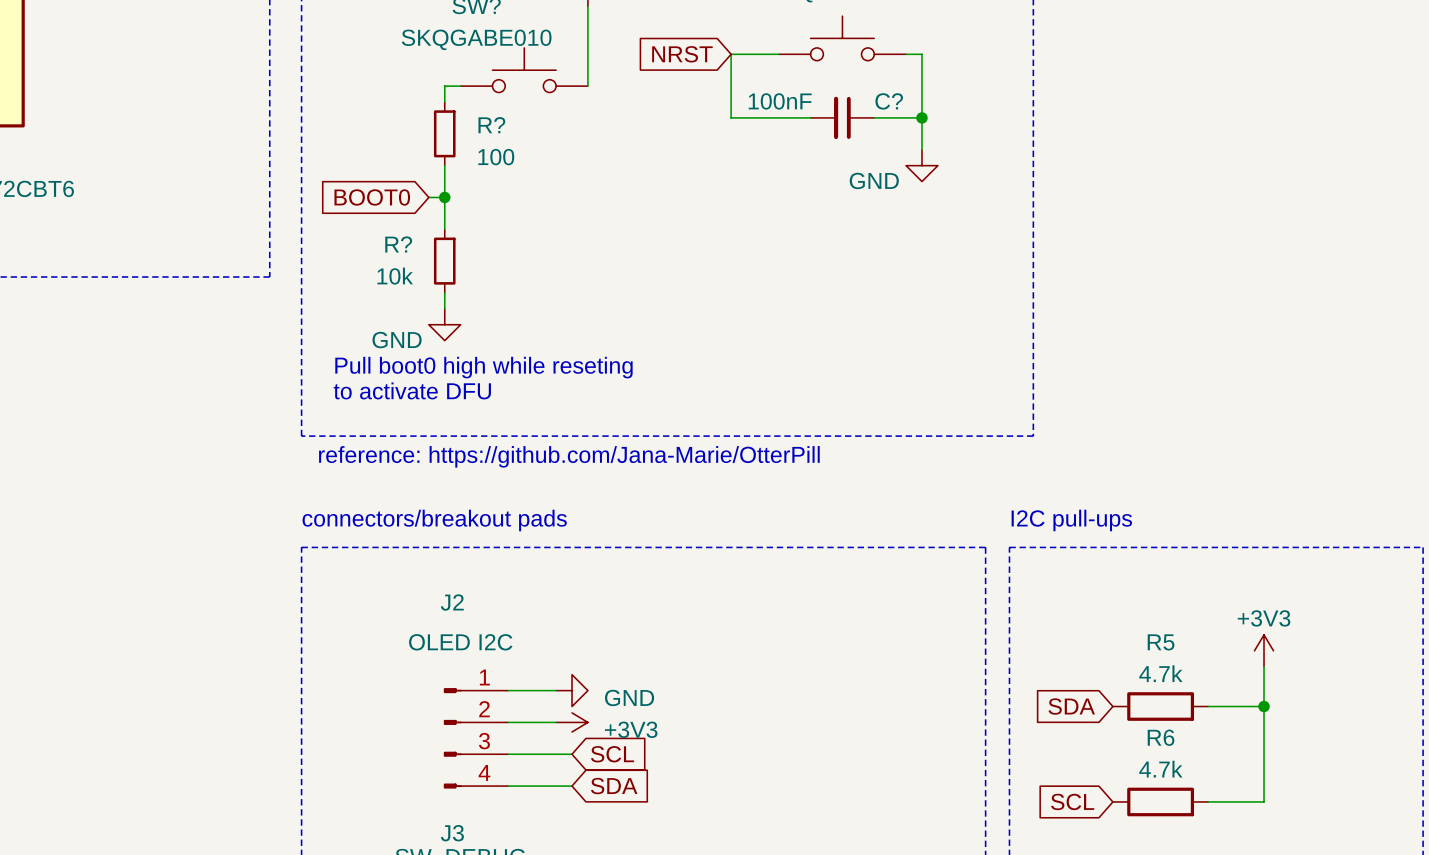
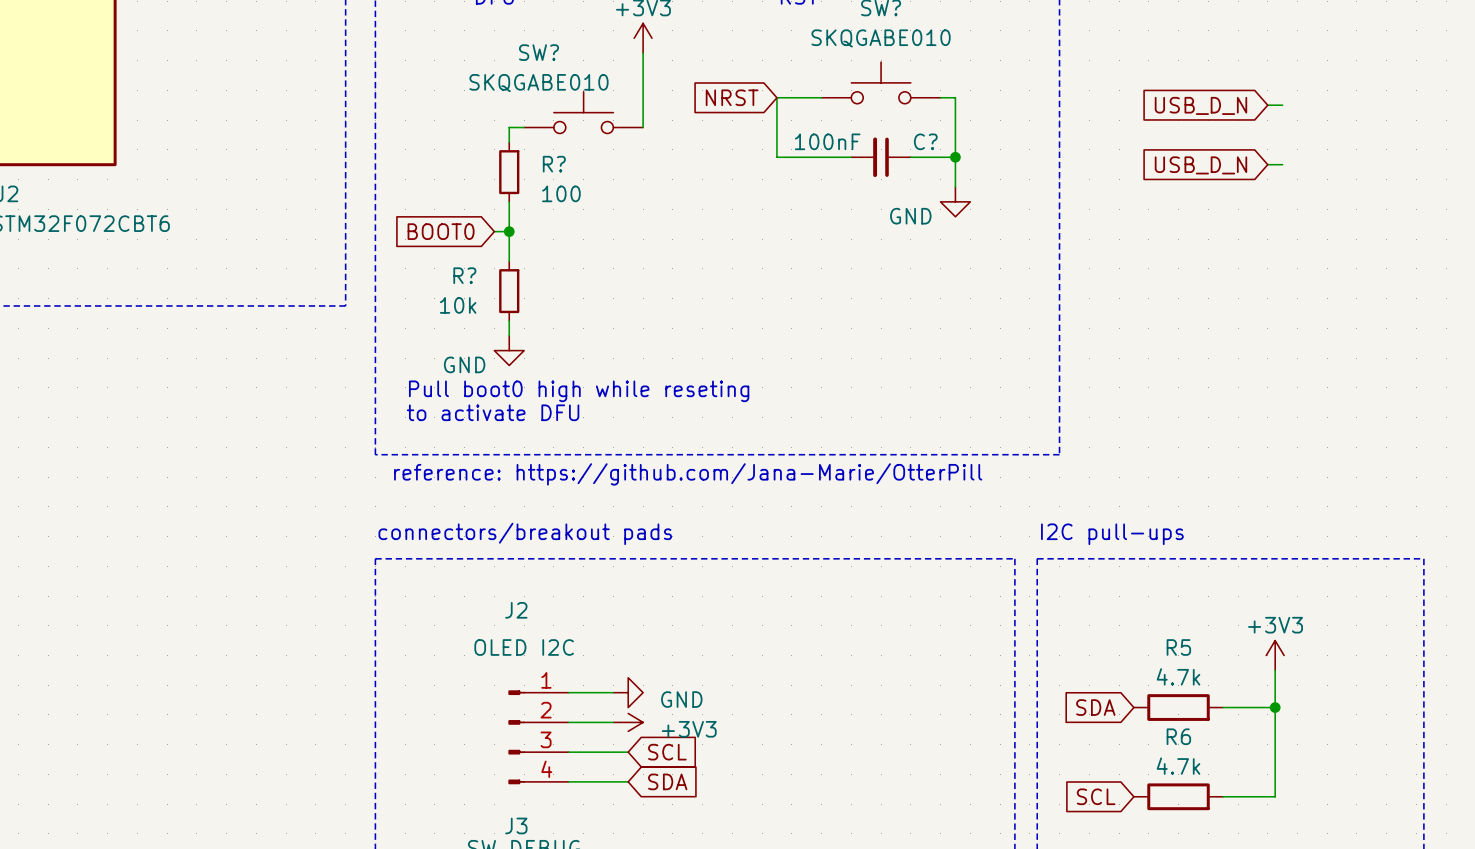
wire: none -> (1267, 105) (1282, 105)
global label: none -> USB_D_N (1200, 105)
wire: none -> (1267, 164) (1282, 164)
global label: none -> USB_D_N (1200, 165)

